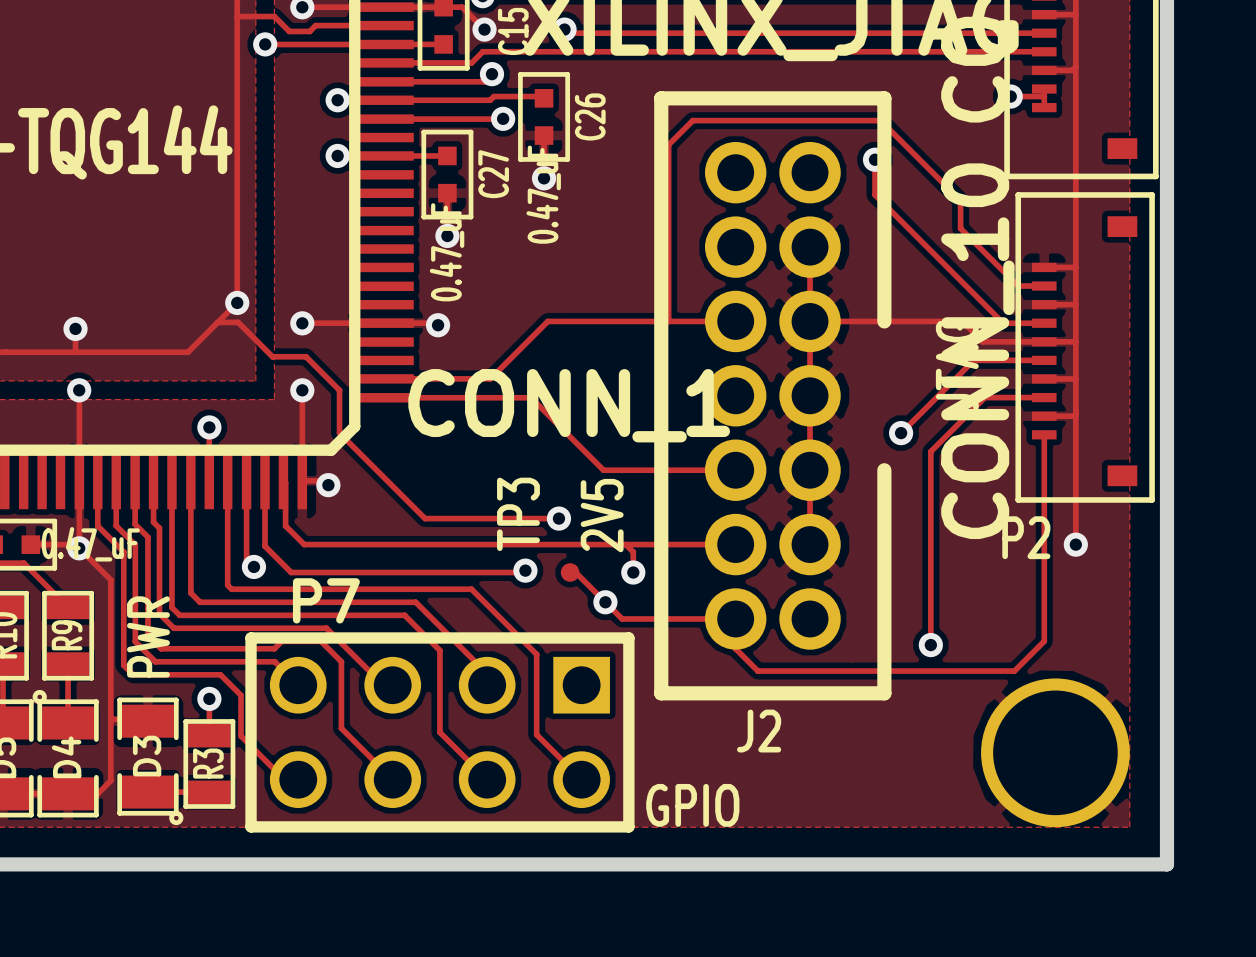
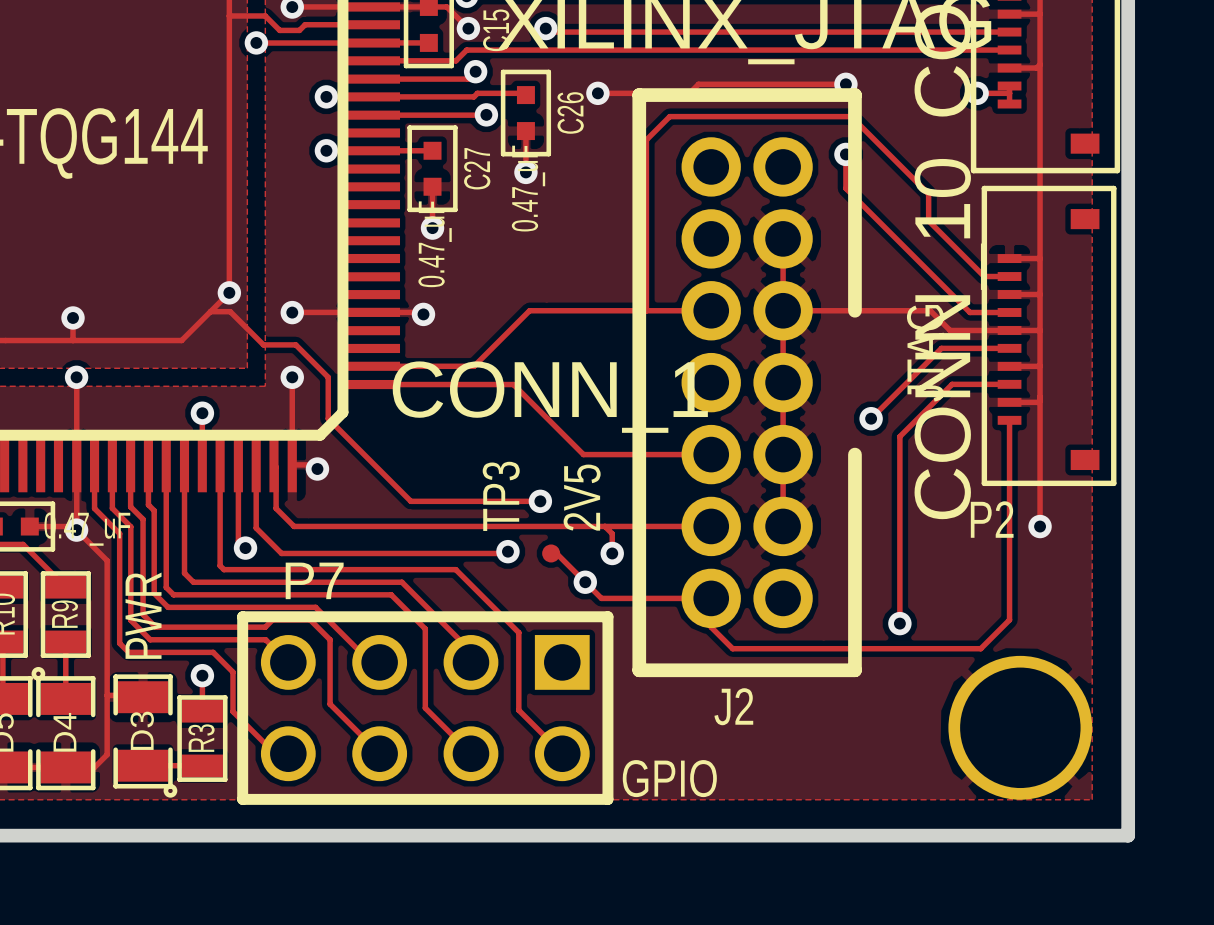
track: none -> (845, 84) (698, 84) (689, 93) (597, 93)
via: none -> (845, 84)
via: none -> (597, 93)

